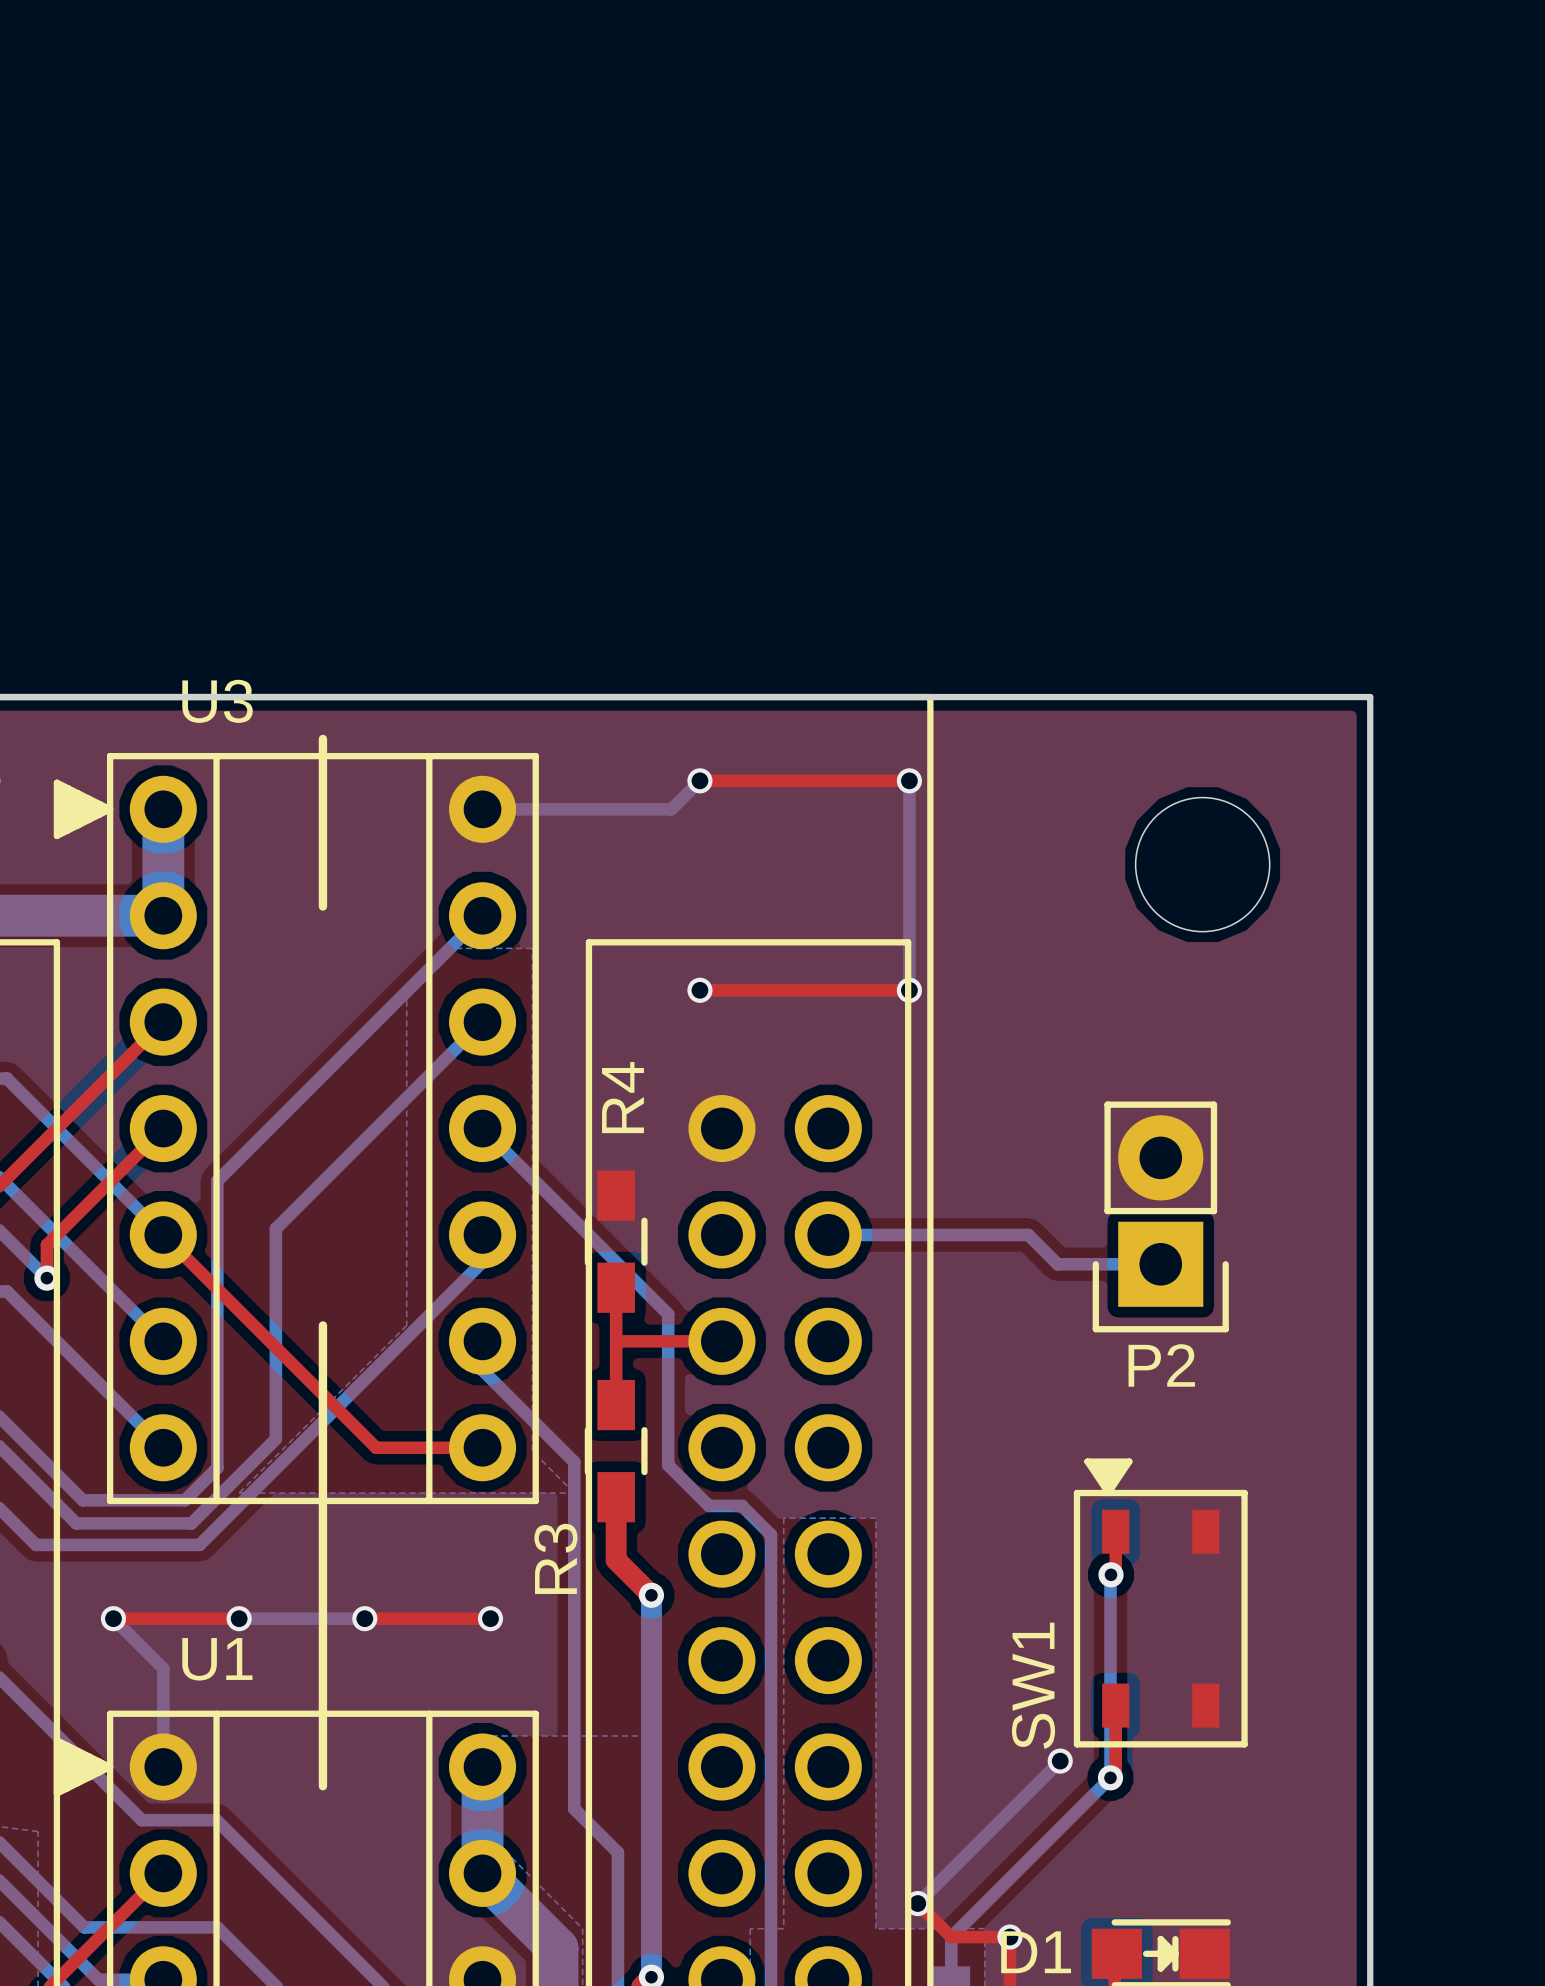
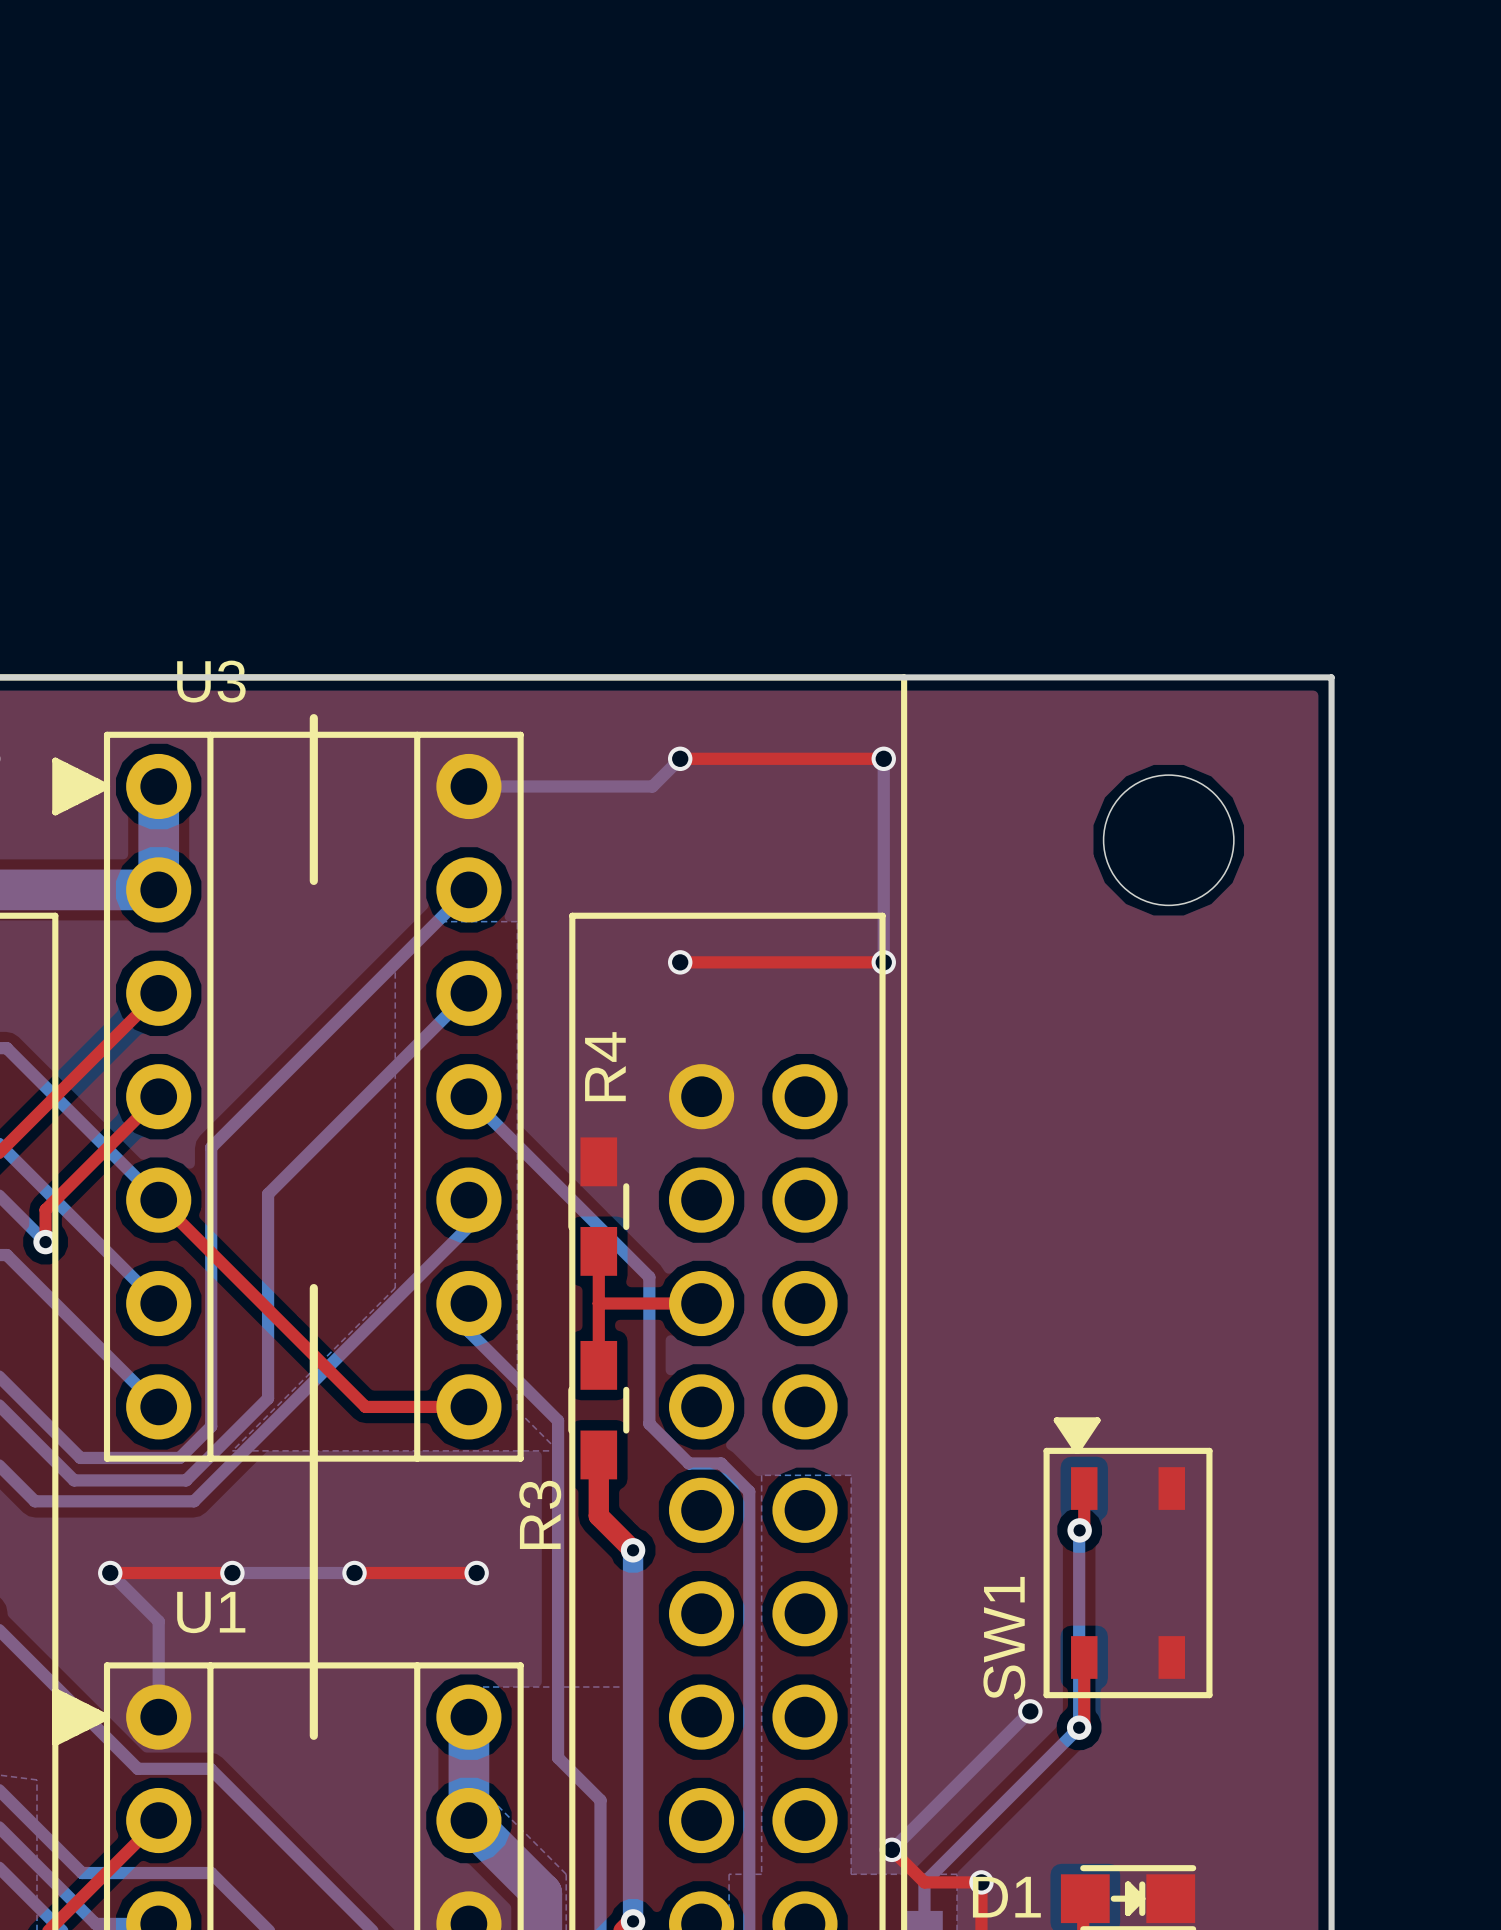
P2: (1160, 1216) -> none
bottom track: (828, 1234) (1028, 1234) (1057, 1264) (1160, 1264) -> none

